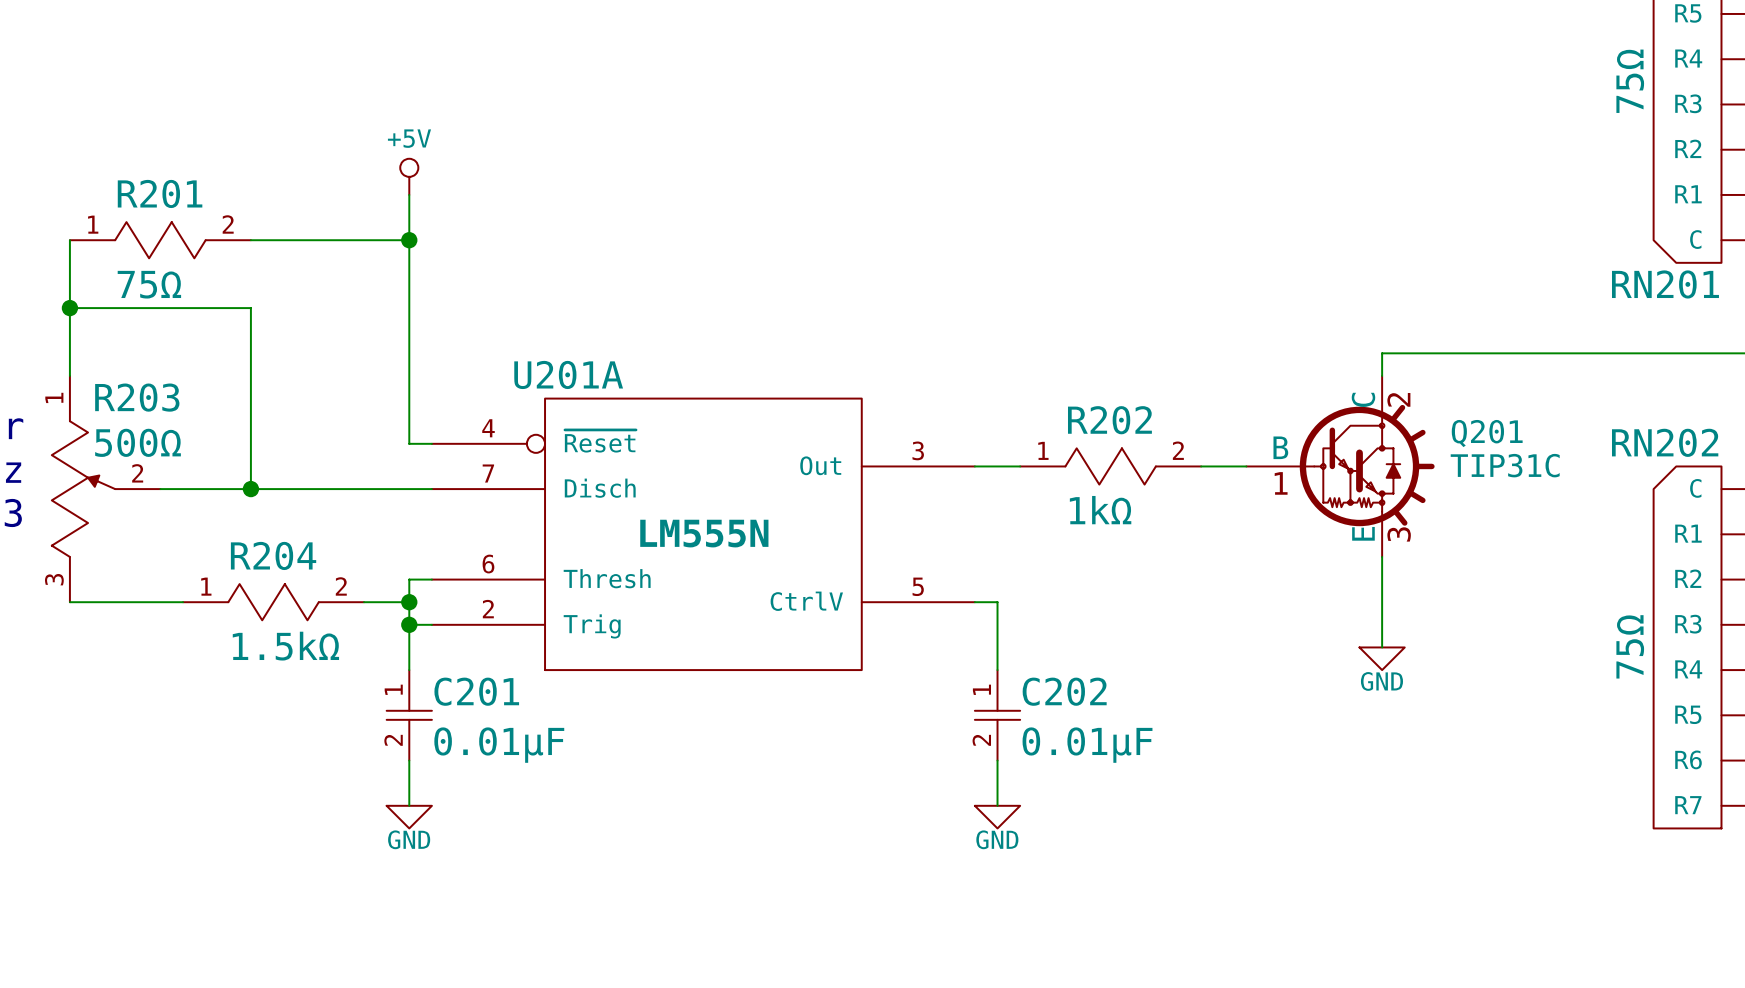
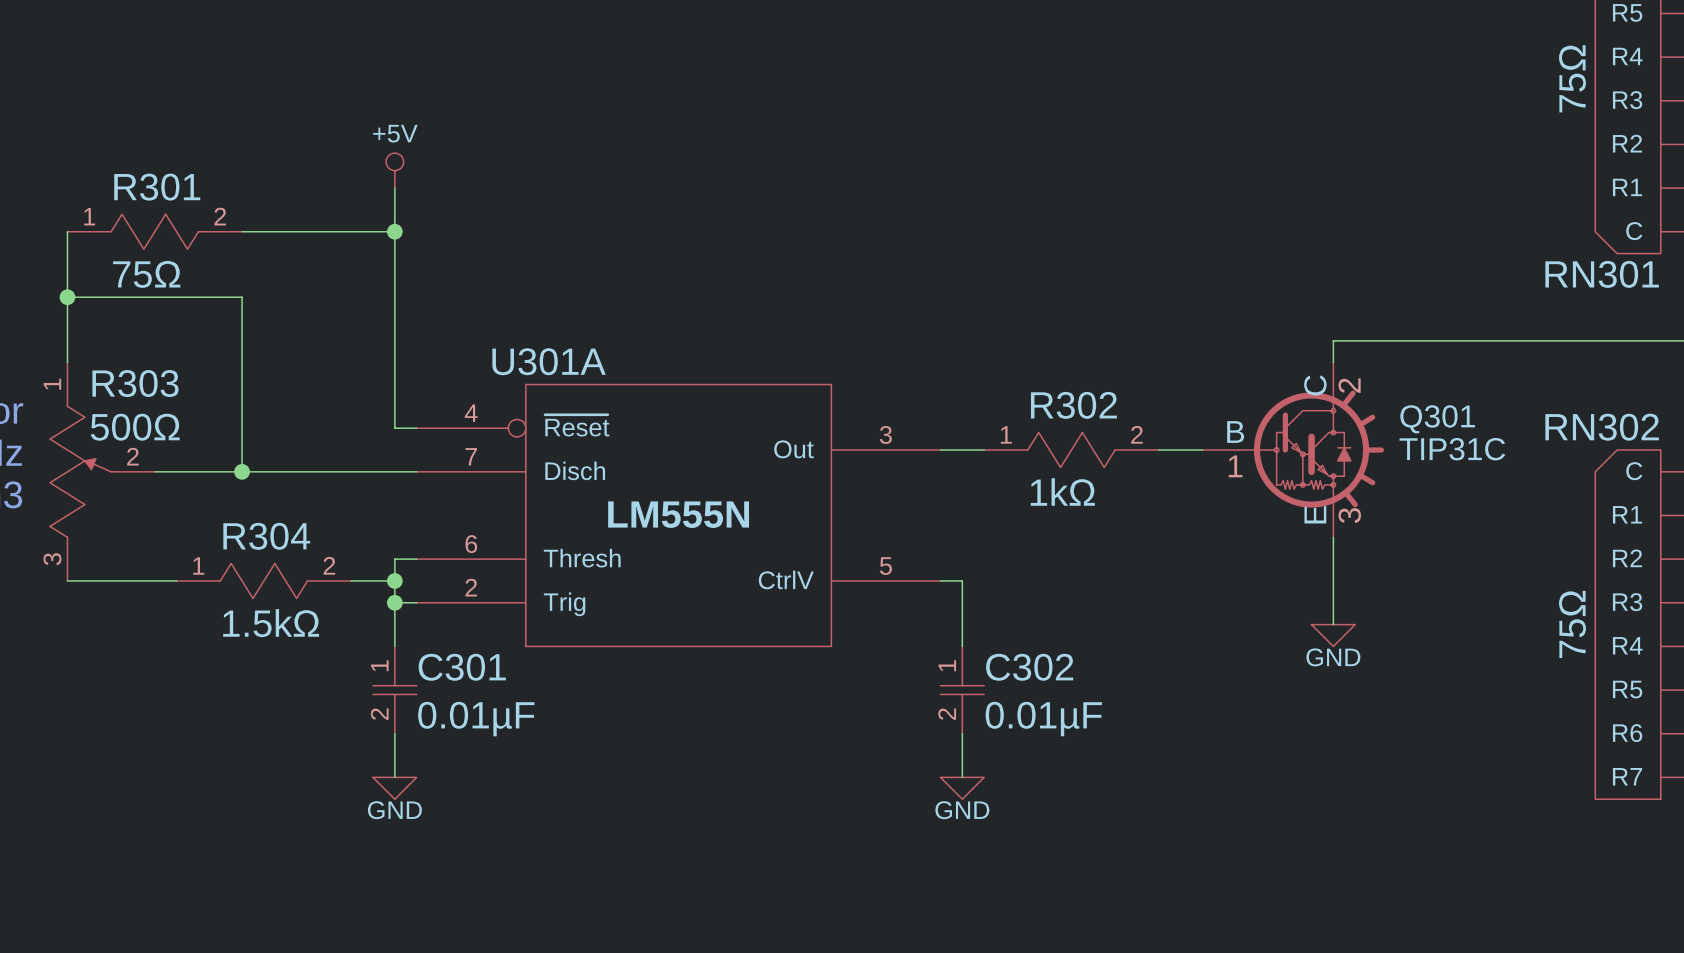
R201 name: R201 (160, 193) -> R301 (157, 187)
RN201 name: RN201 (1665, 284) -> RN301 (1602, 274)
U201A name: U201A (568, 374) -> U301A (549, 361)
R203 name: R203 (137, 397) -> R303 (135, 383)
R202 name: R202 (1109, 420) -> R302 (1073, 405)
Q201 name: Q201 (1487, 433) -> Q301 (1437, 419)
RN202 name: RN202 (1665, 442) -> RN302 (1602, 427)
R204 name: R204 (273, 555) -> R304 (266, 536)
C201 name: C201 (476, 691) -> C301 (462, 667)
C202 name: C202 (1064, 691) -> C302 (1029, 667)

